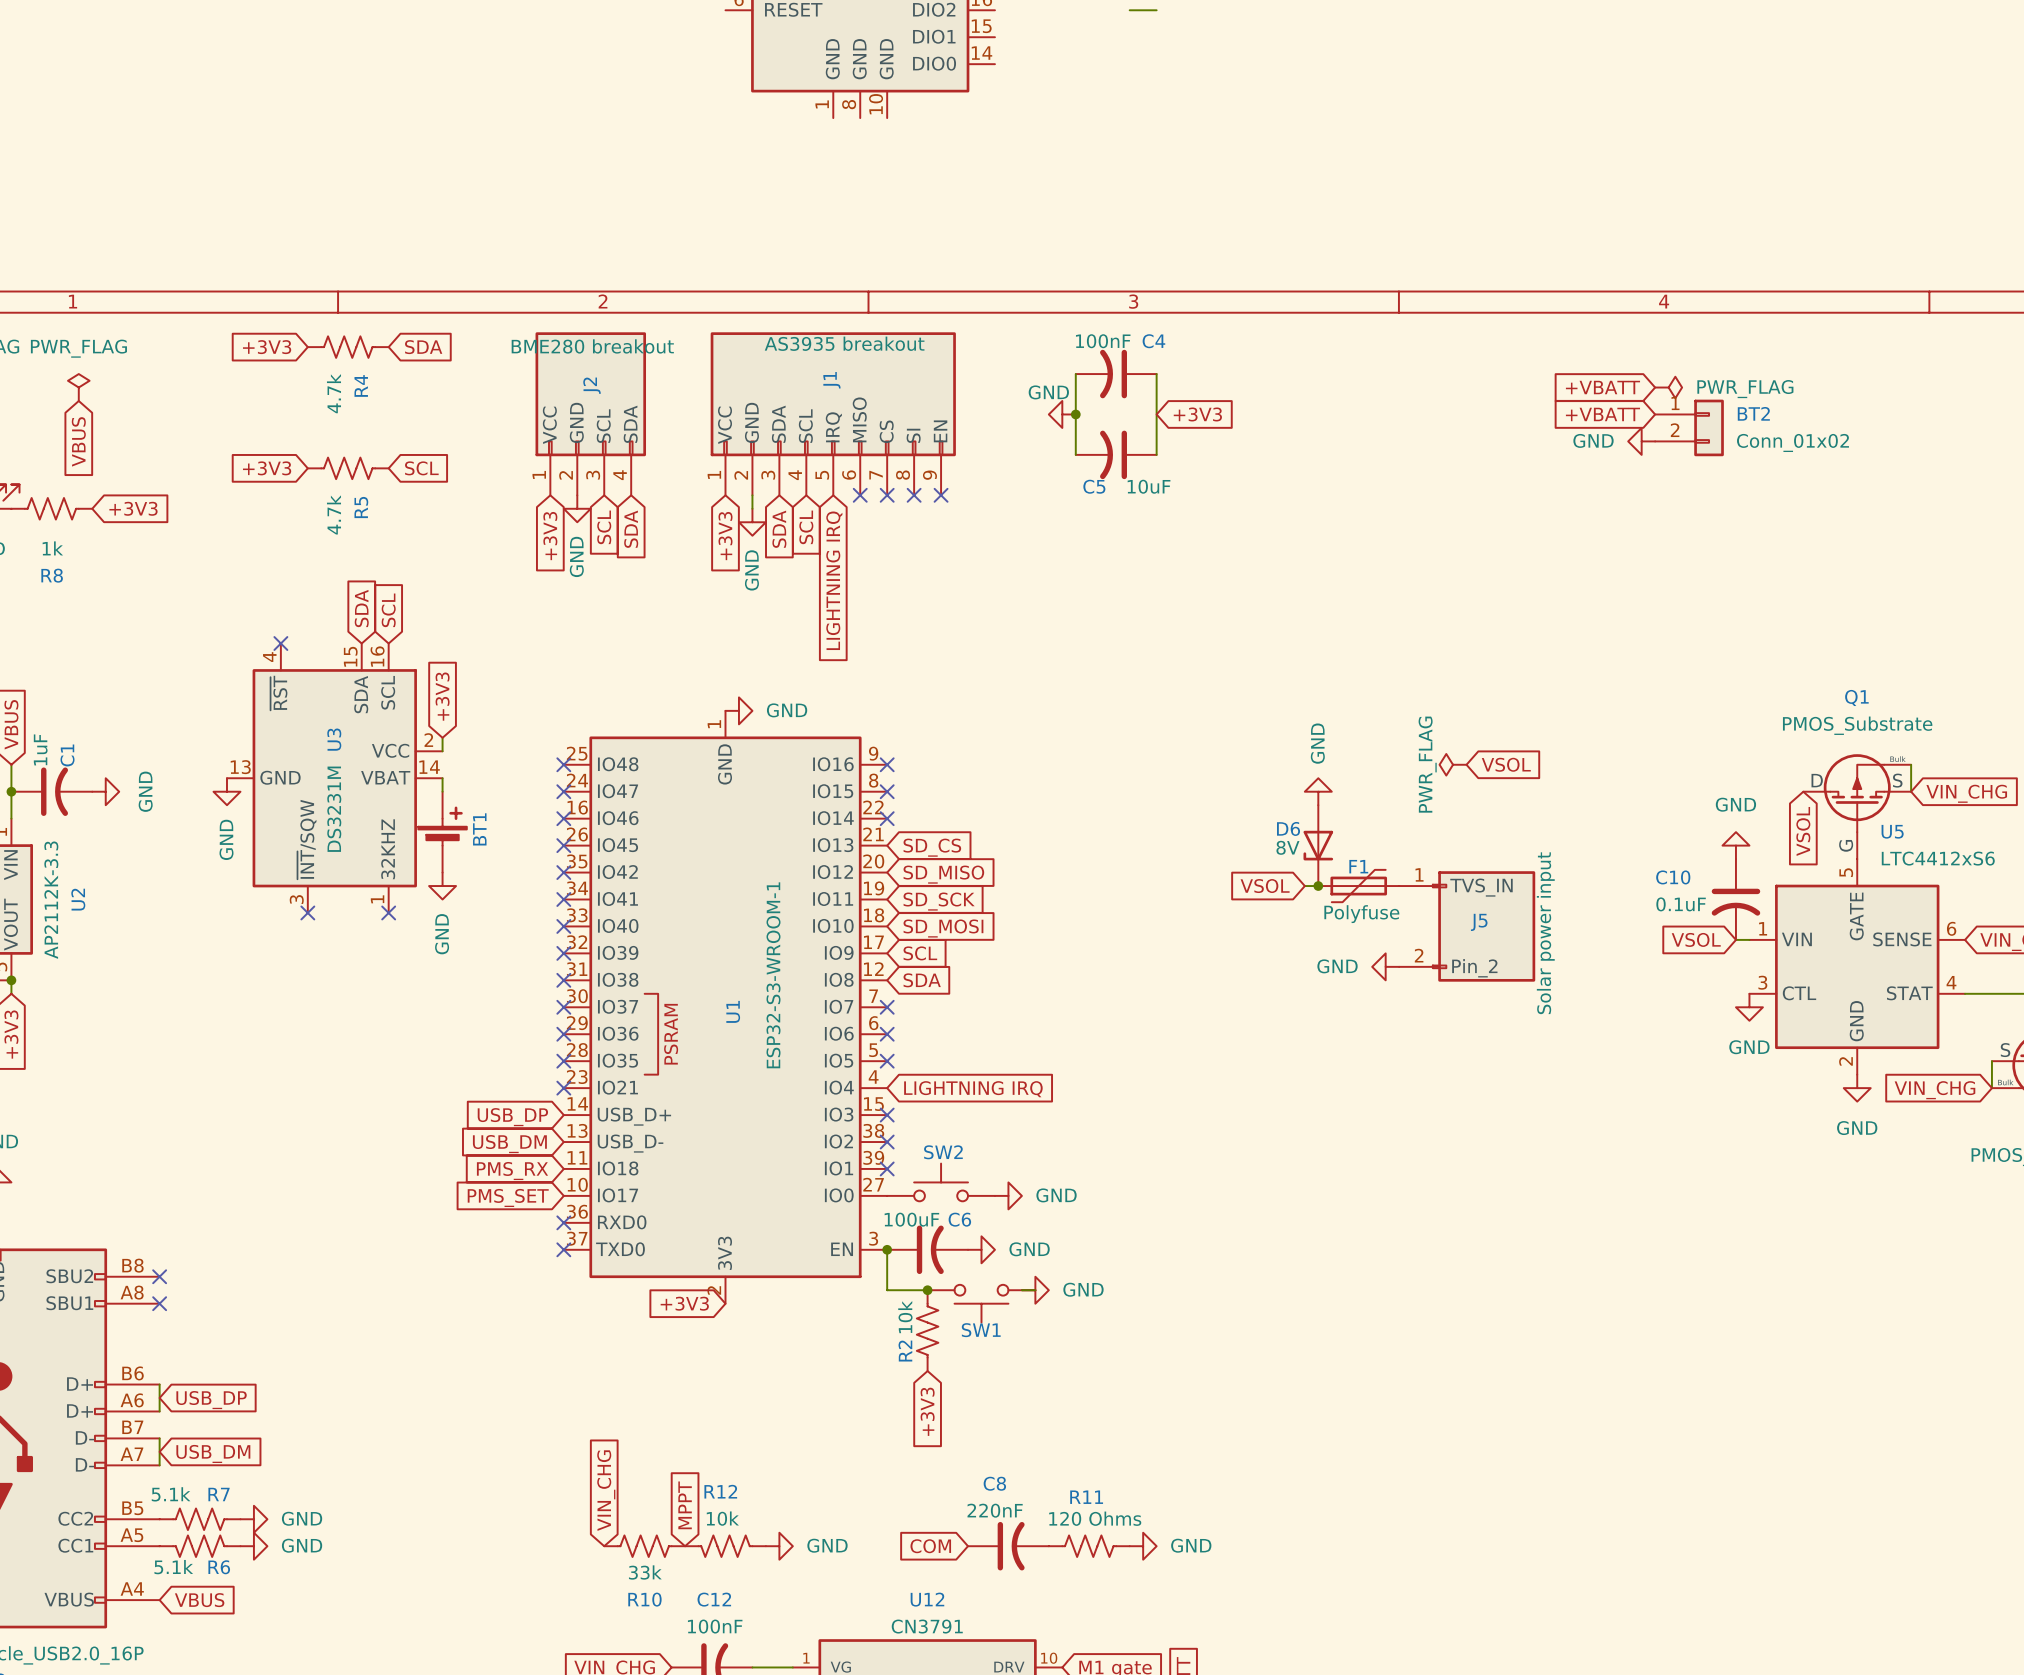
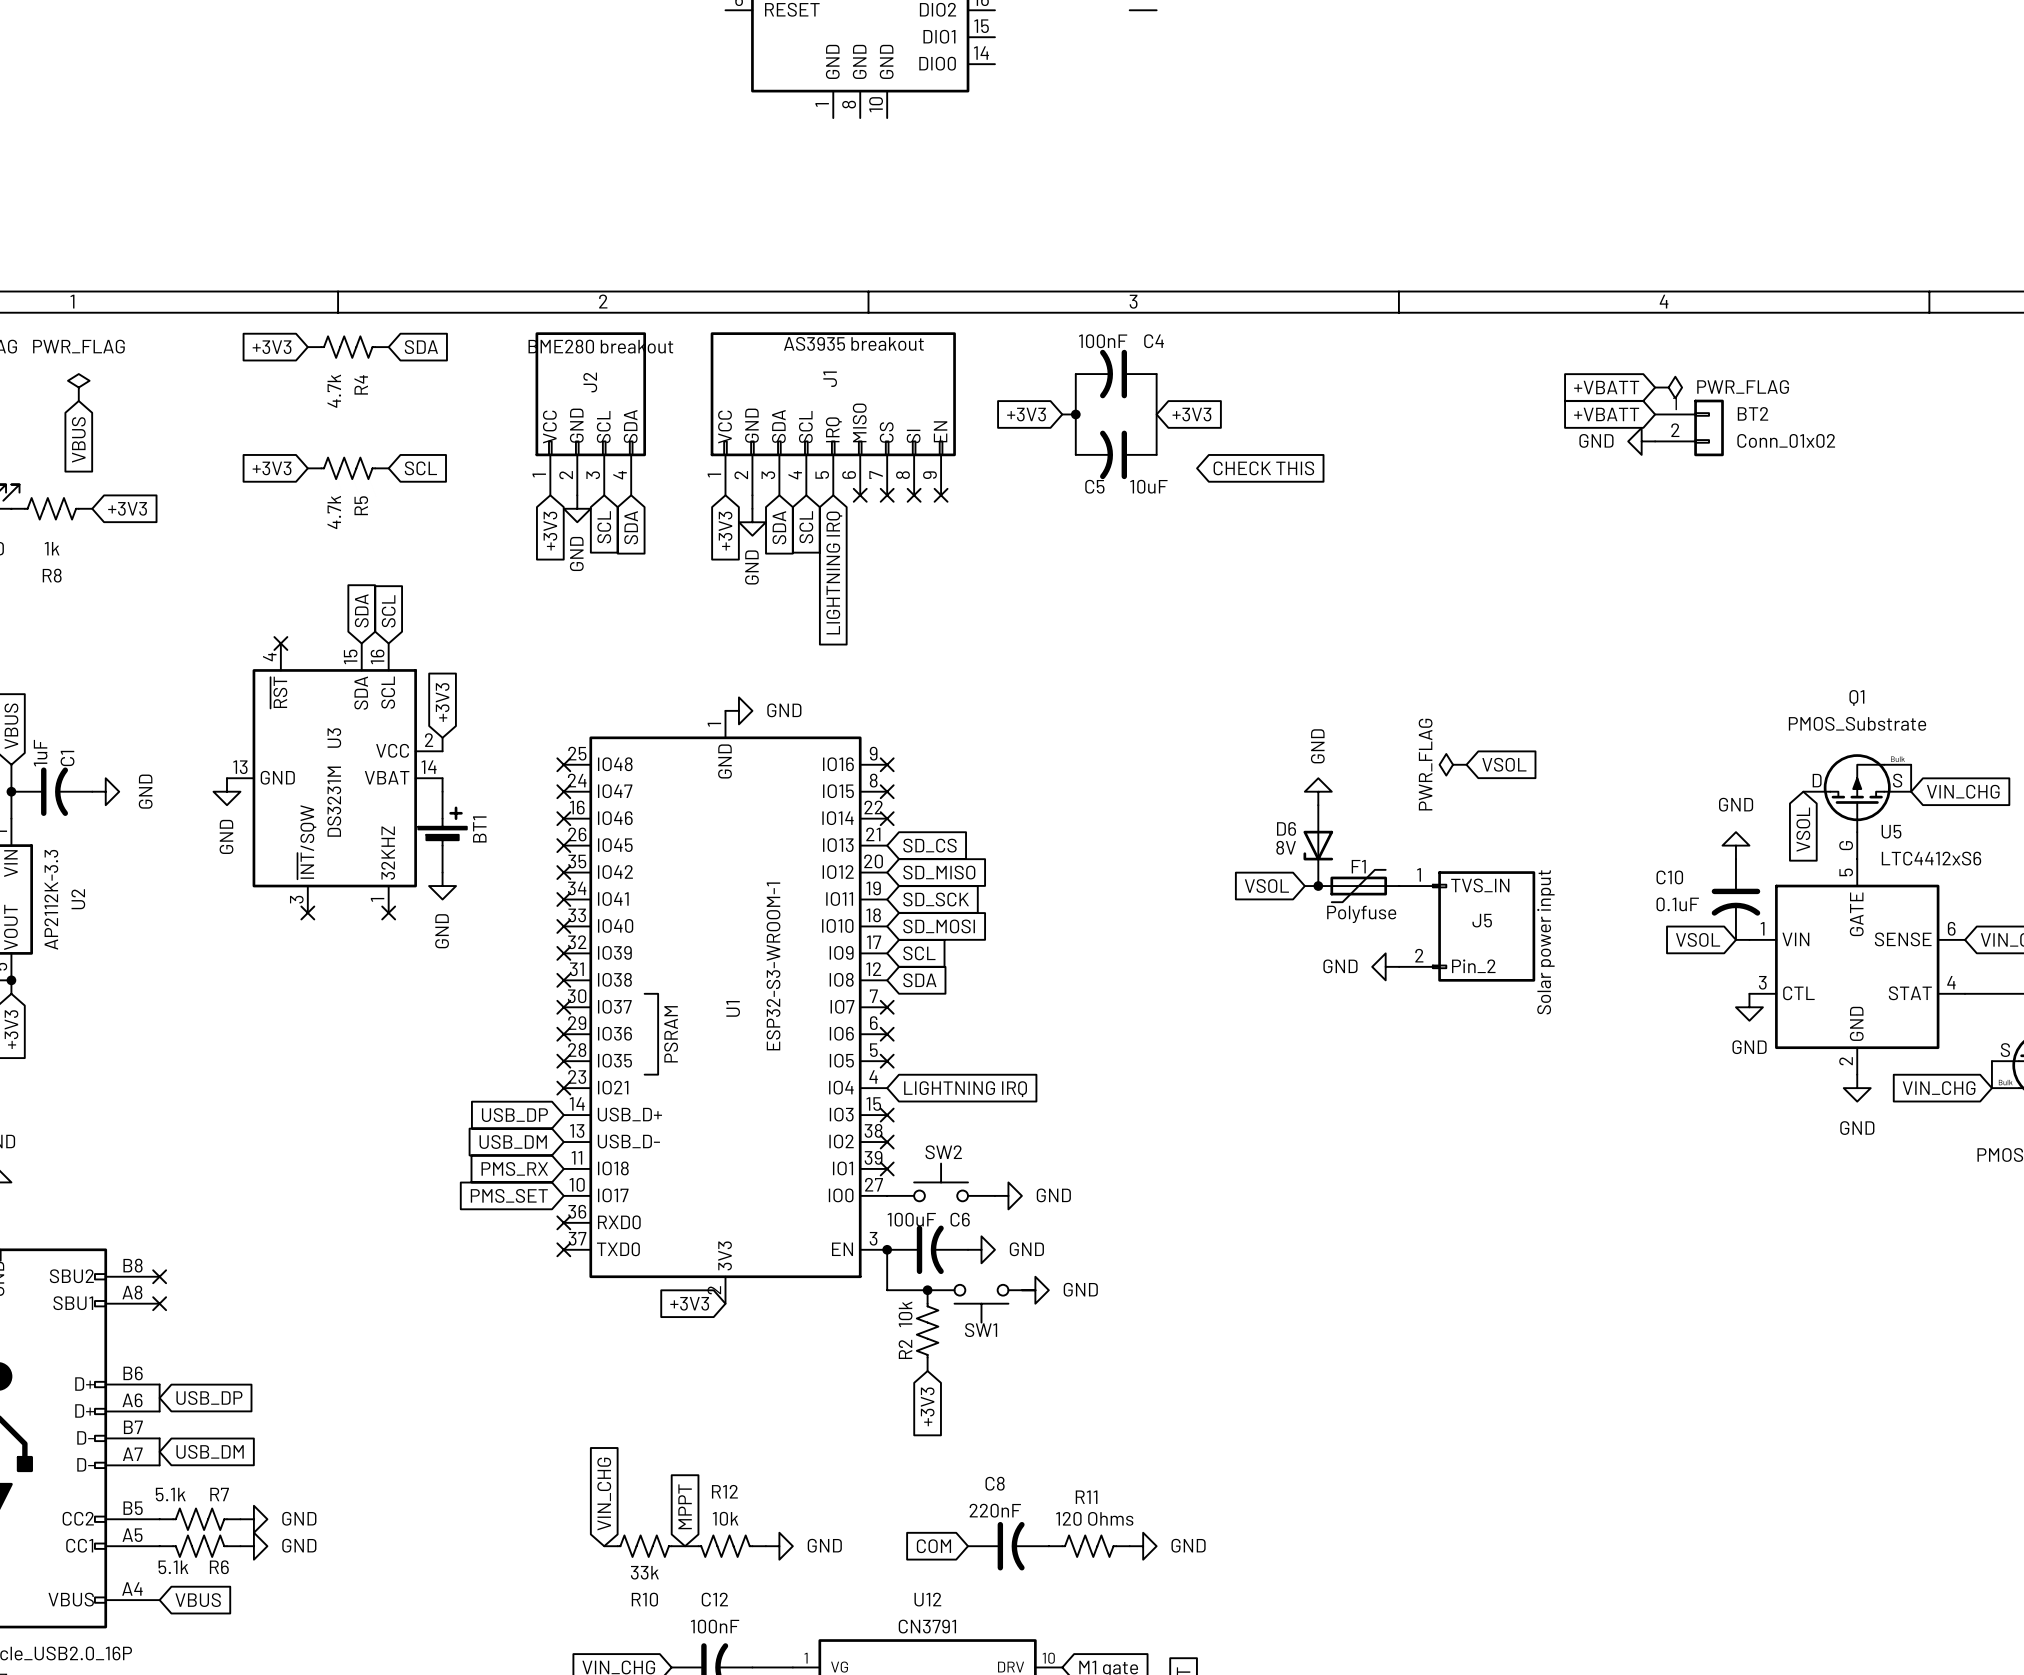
global label: none -> +3V3 (1026, 414)
power symbol: GND (1062, 414) -> none
global label: none -> CHECK THIS (1263, 468)

